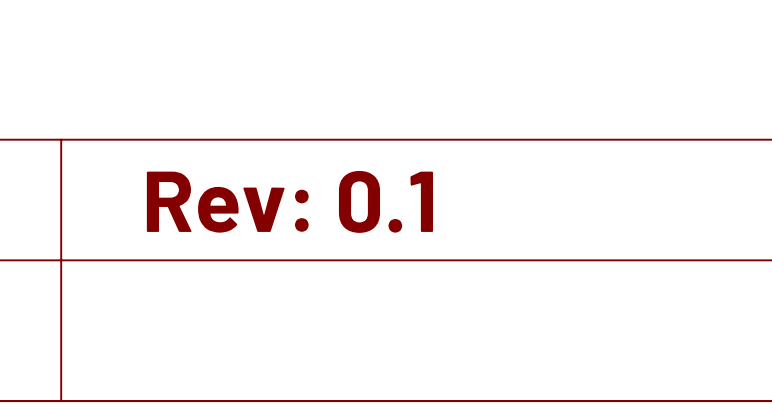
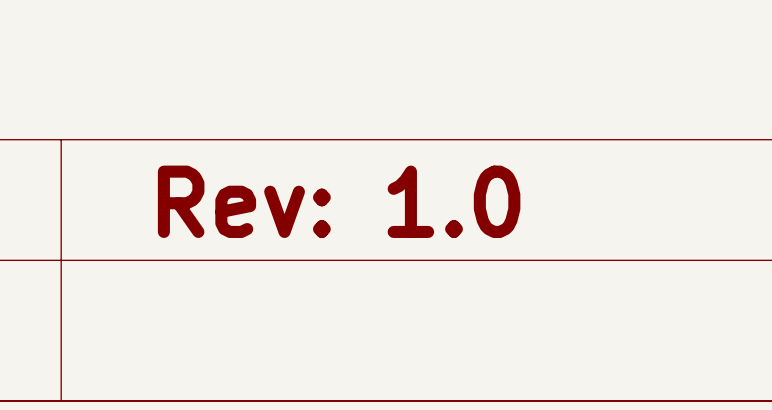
title block: Rev: 0.1 (289, 201) -> Rev: 1.0 (339, 201)

